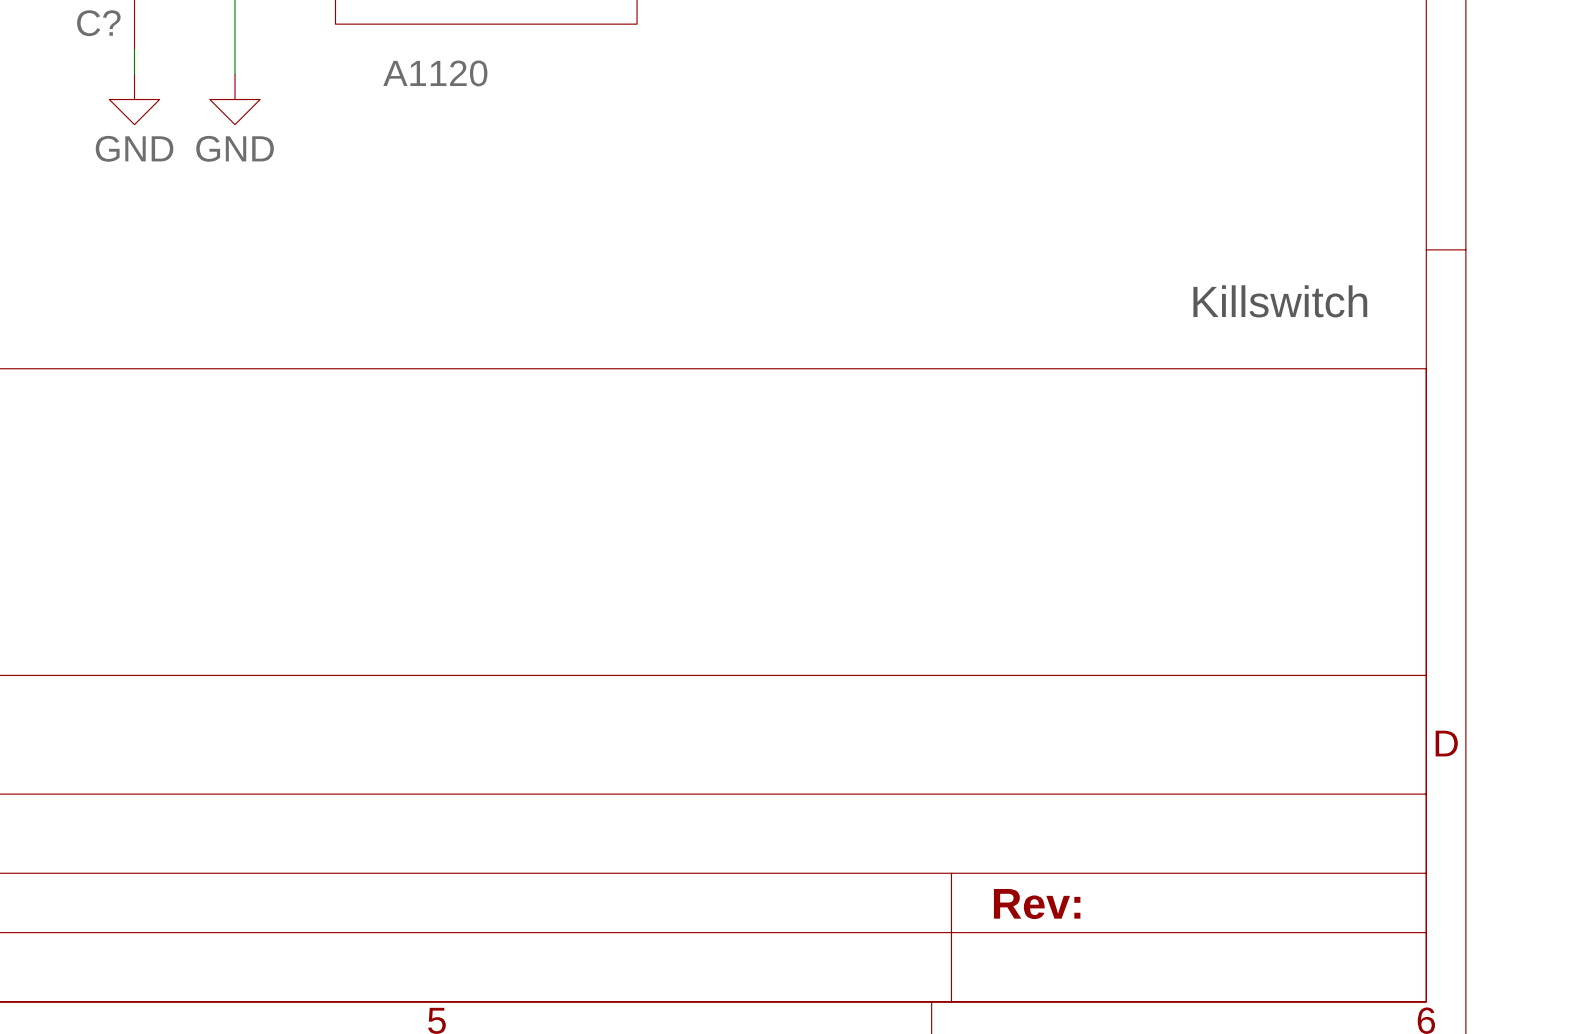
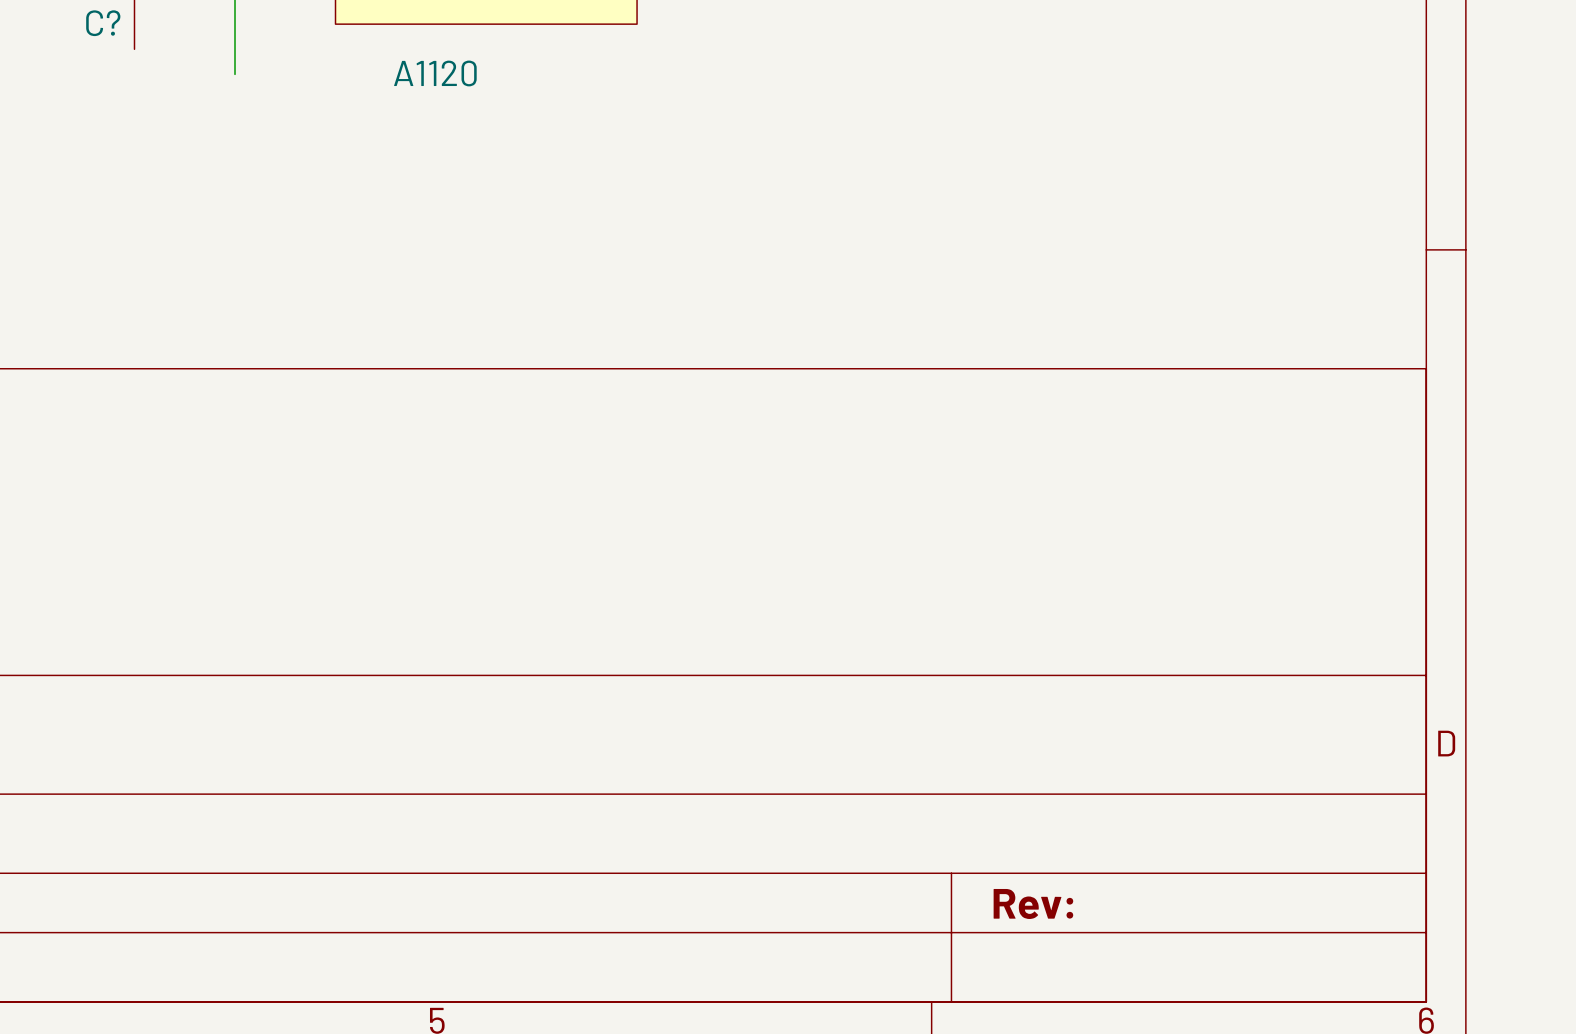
wire: (134, 49) (134, 74) -> none
power symbol: GND (134, 99) -> none
power symbol: GND (235, 99) -> none
text: Killswitch (1280, 301) -> none

